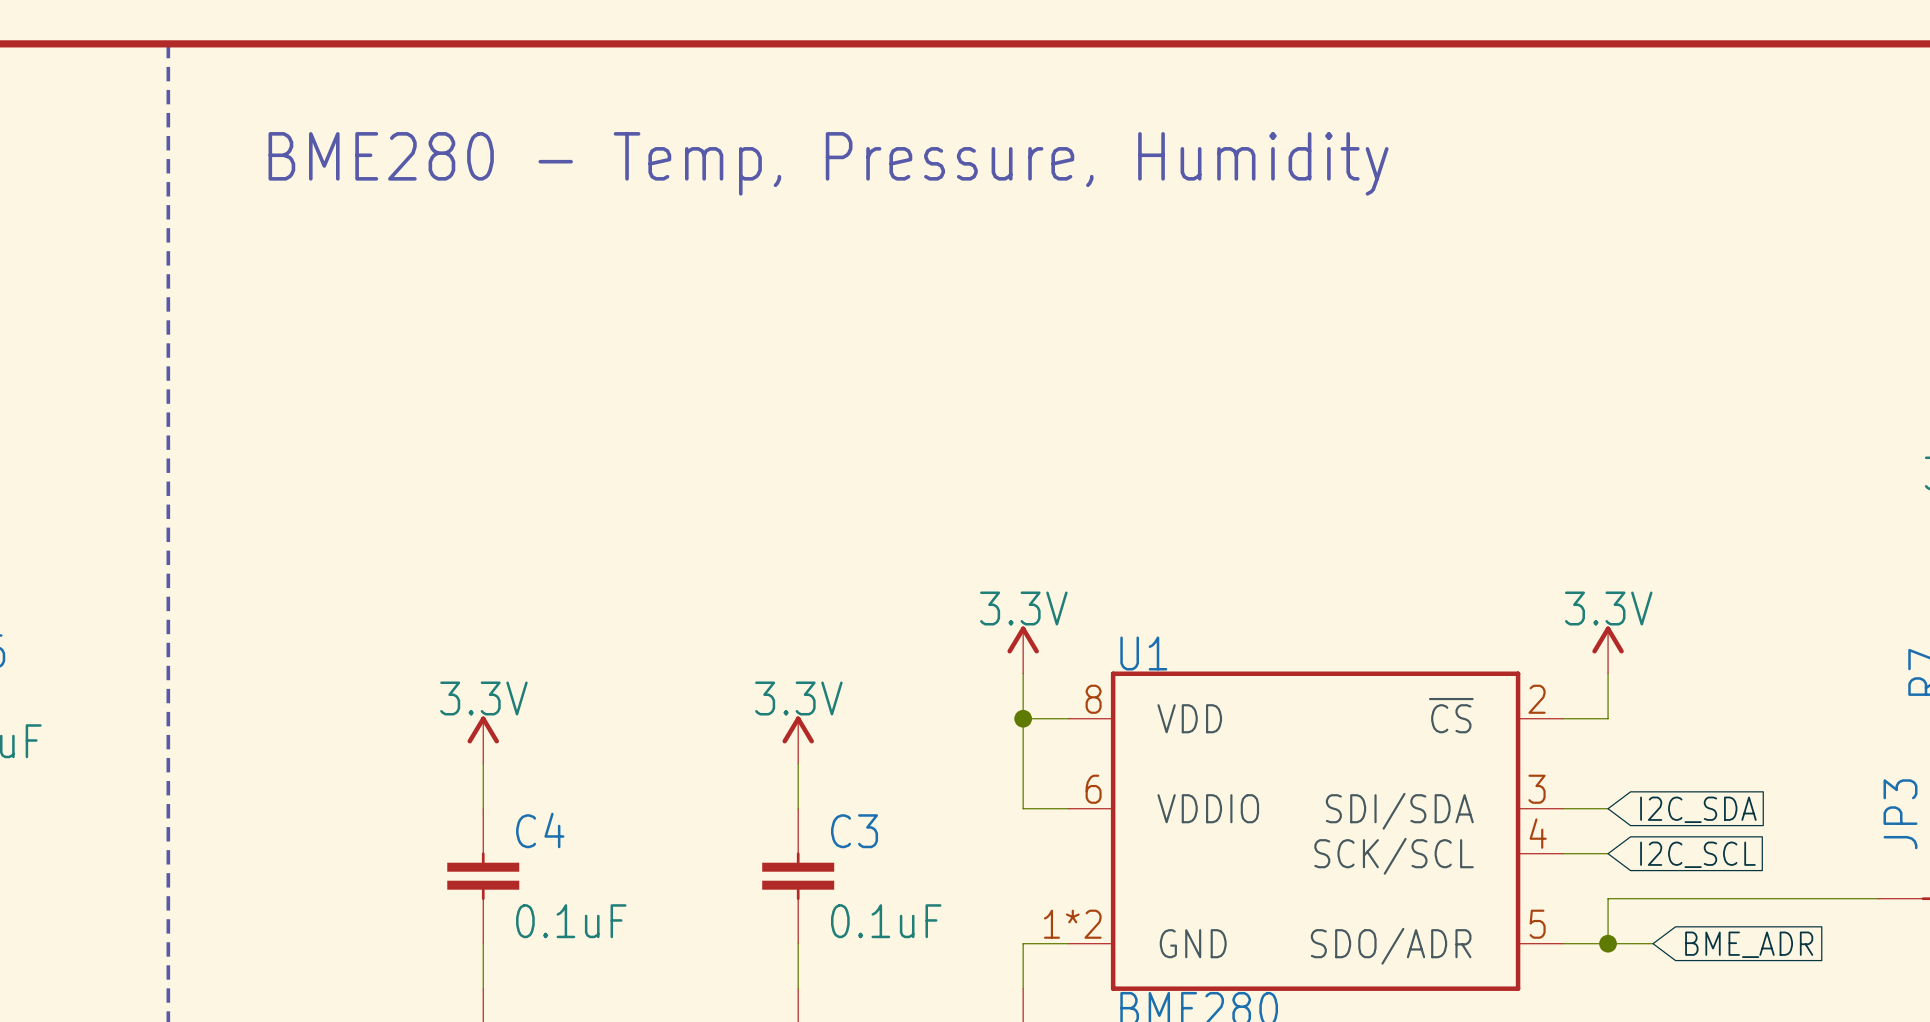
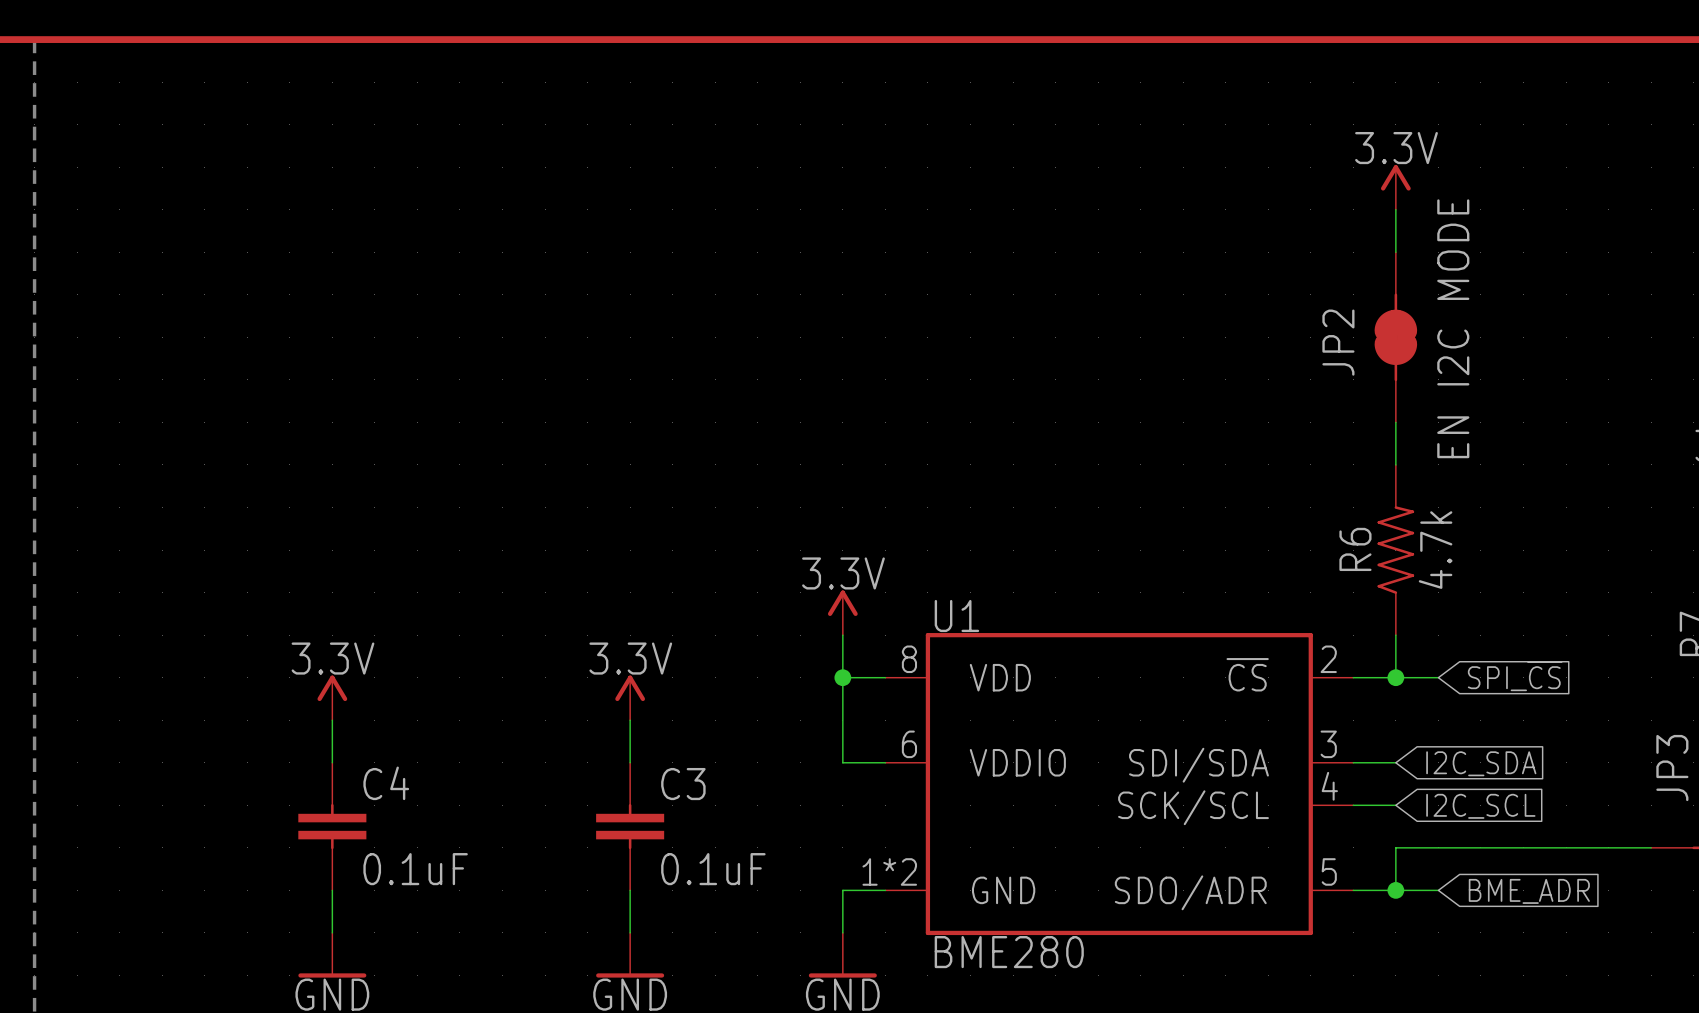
text: BME280 - Temp, Pressure, Humidity (828, 163) -> none
power symbol: none -> 3.3V (1395, 187)
wire: none -> (1395, 209) (1395, 252)
JP2: none -> EN I2C MODE (1395, 337)
wire: none -> (1395, 422) (1395, 464)
R6: none -> 4.7k (1395, 550)
power symbol: 3.3V (1608, 650) -> none
global label: none -> SPI_~{CS} (1515, 676)
wire: none -> (1395, 677) (1438, 677)
junction: none -> (1395, 677)

